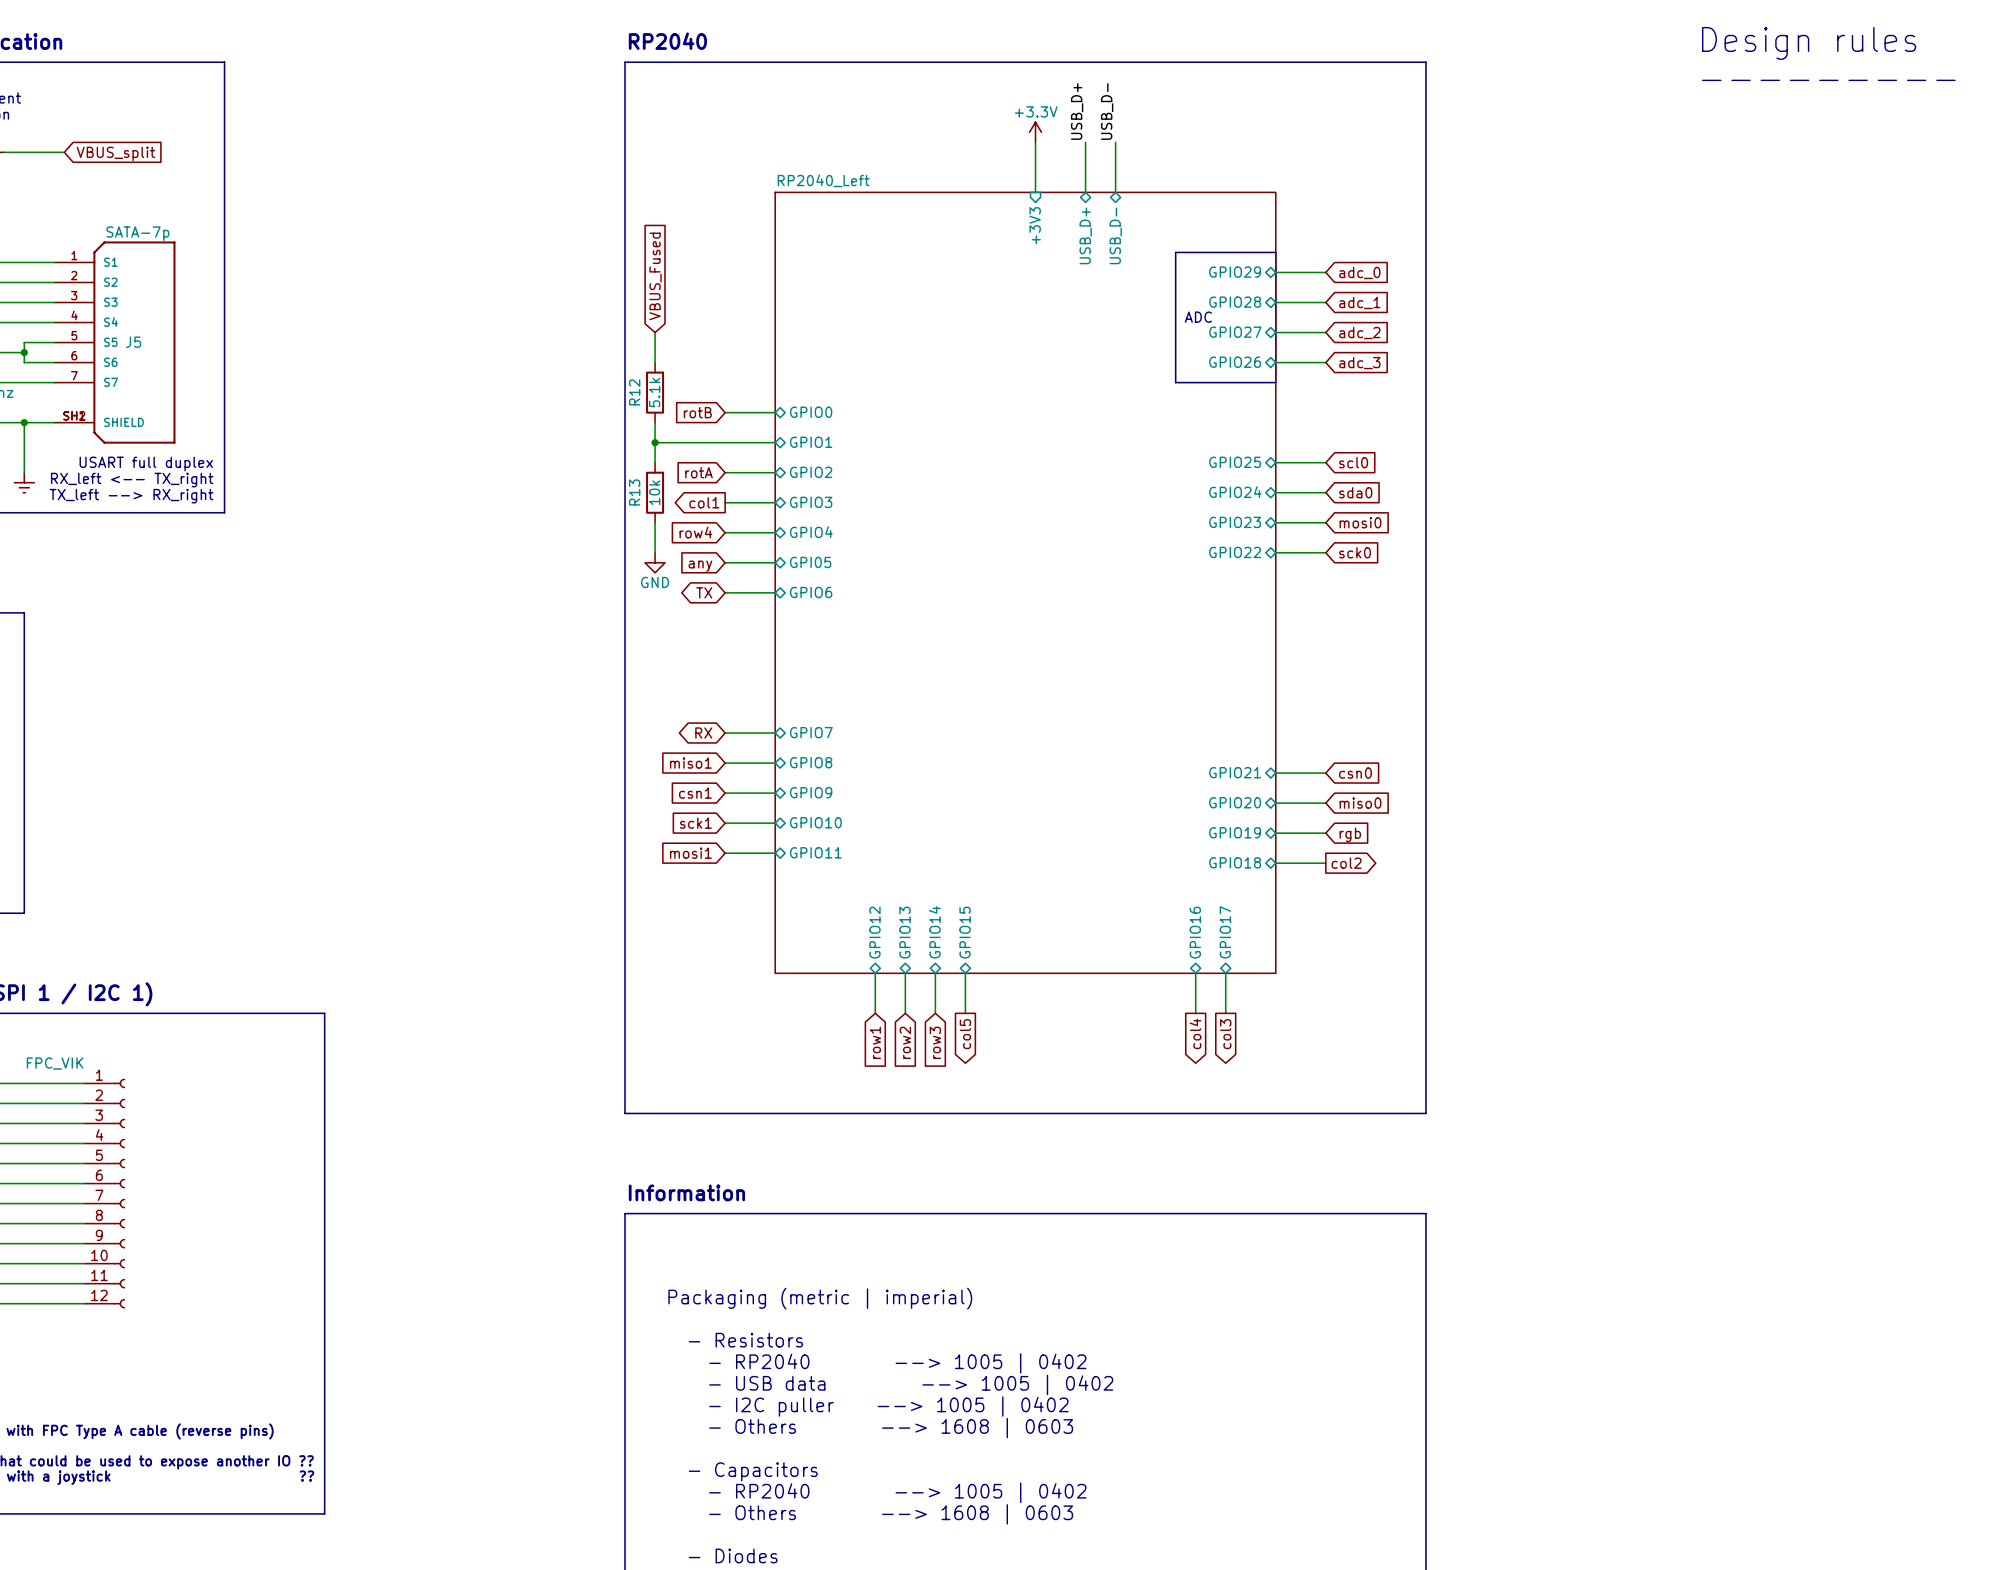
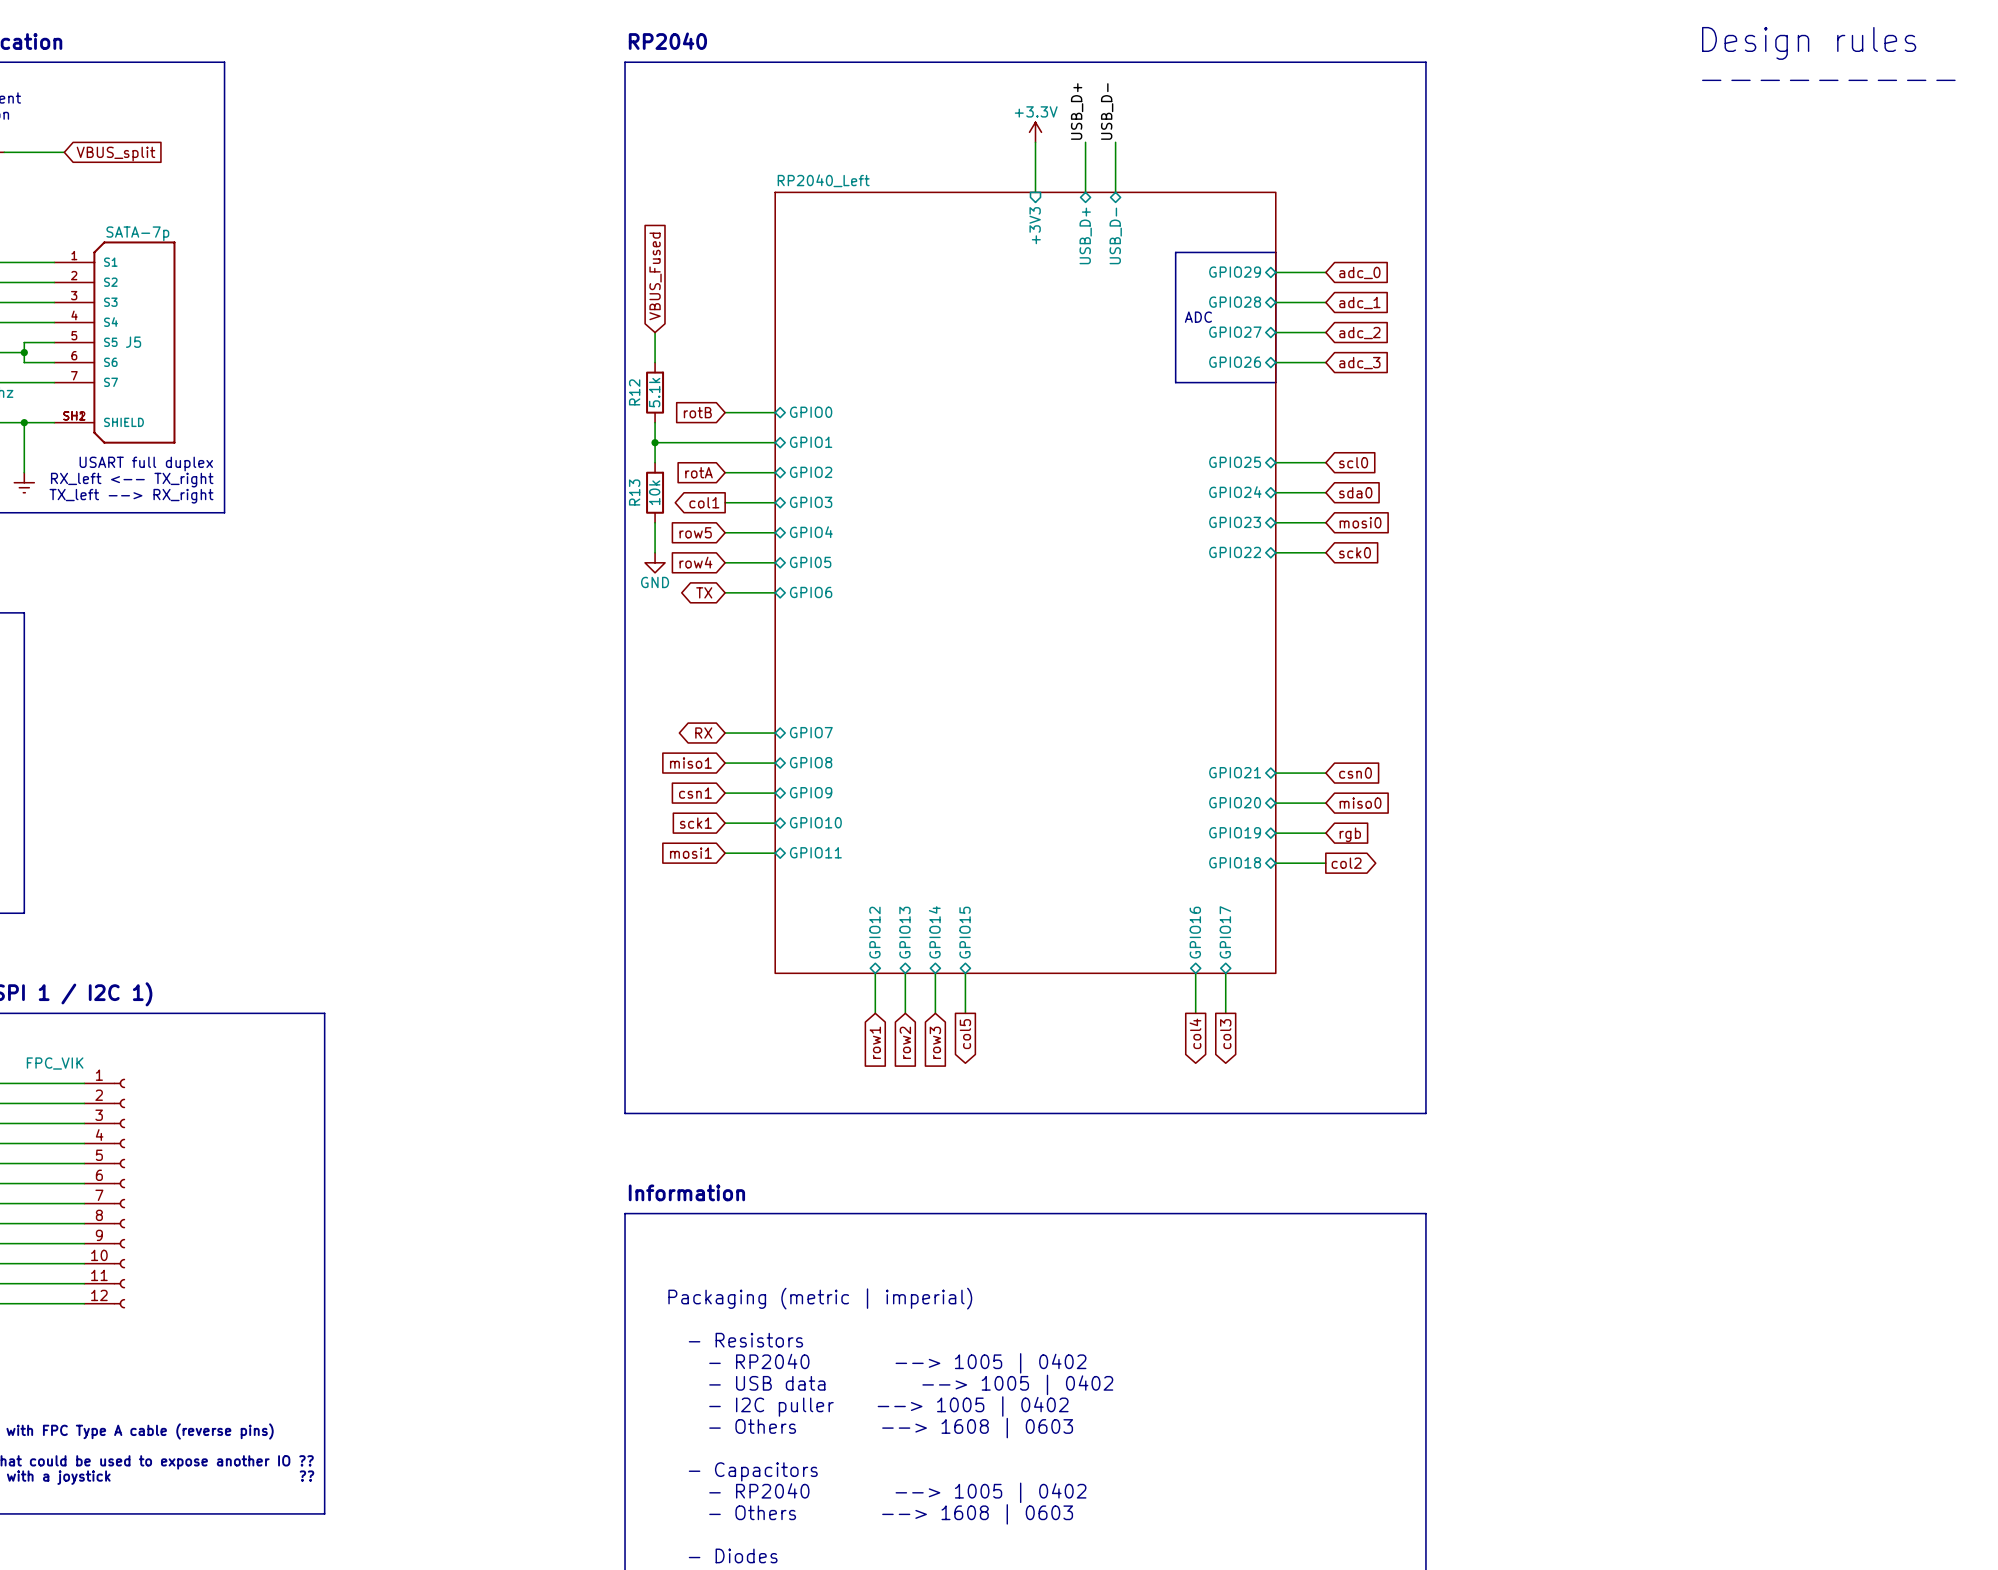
global label: row4 (695, 532) -> row5 (695, 532)
global label: any (700, 566) -> row4 (695, 562)

